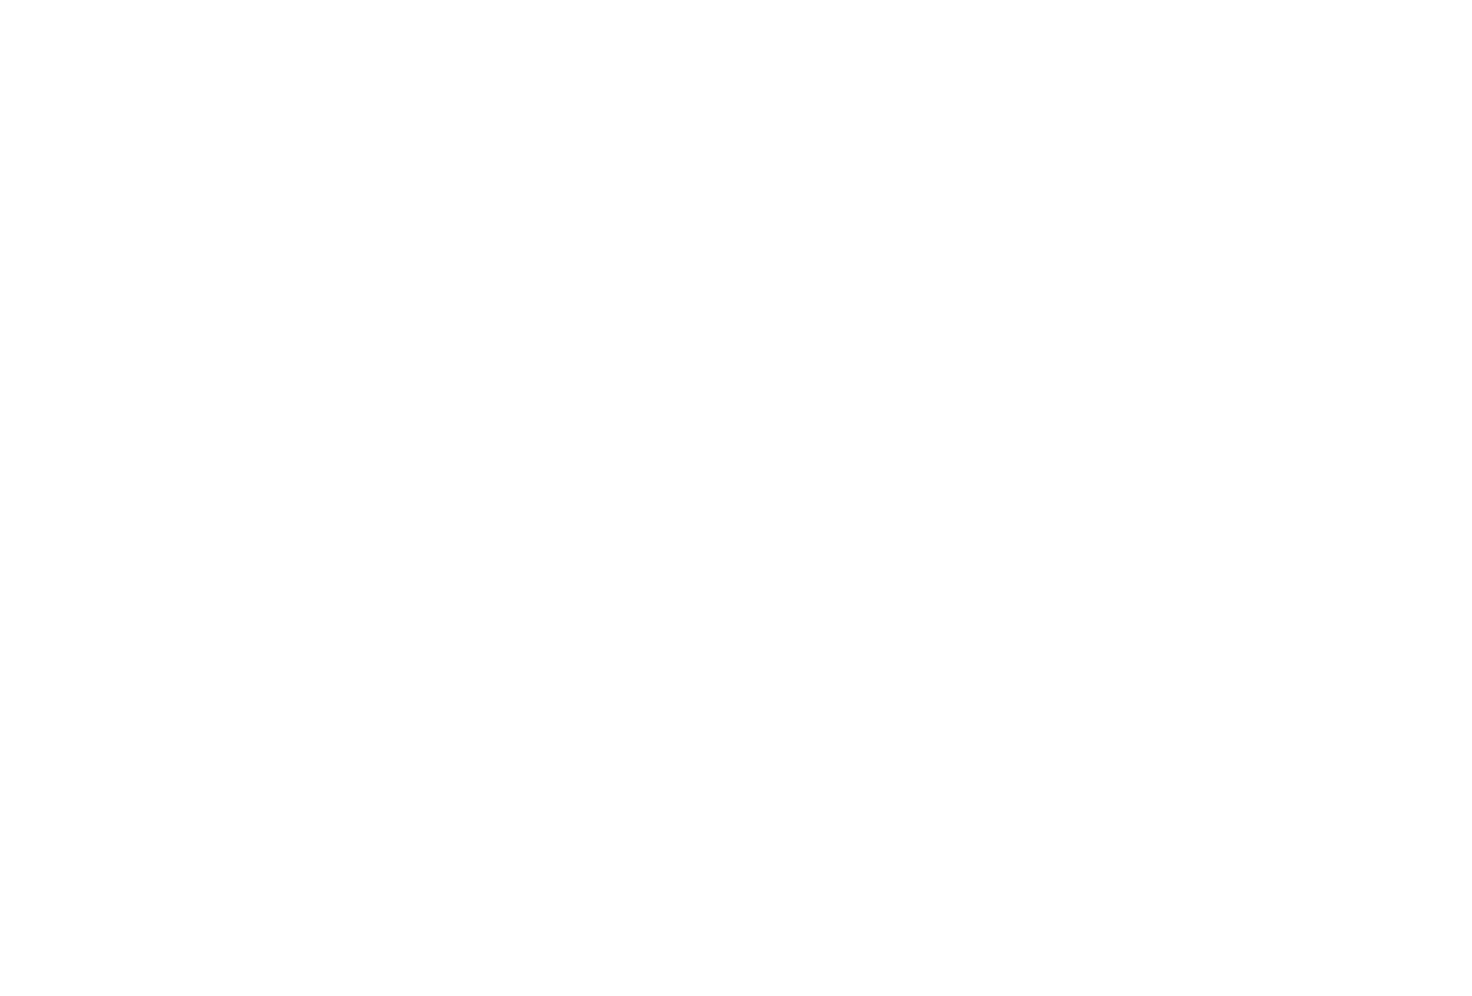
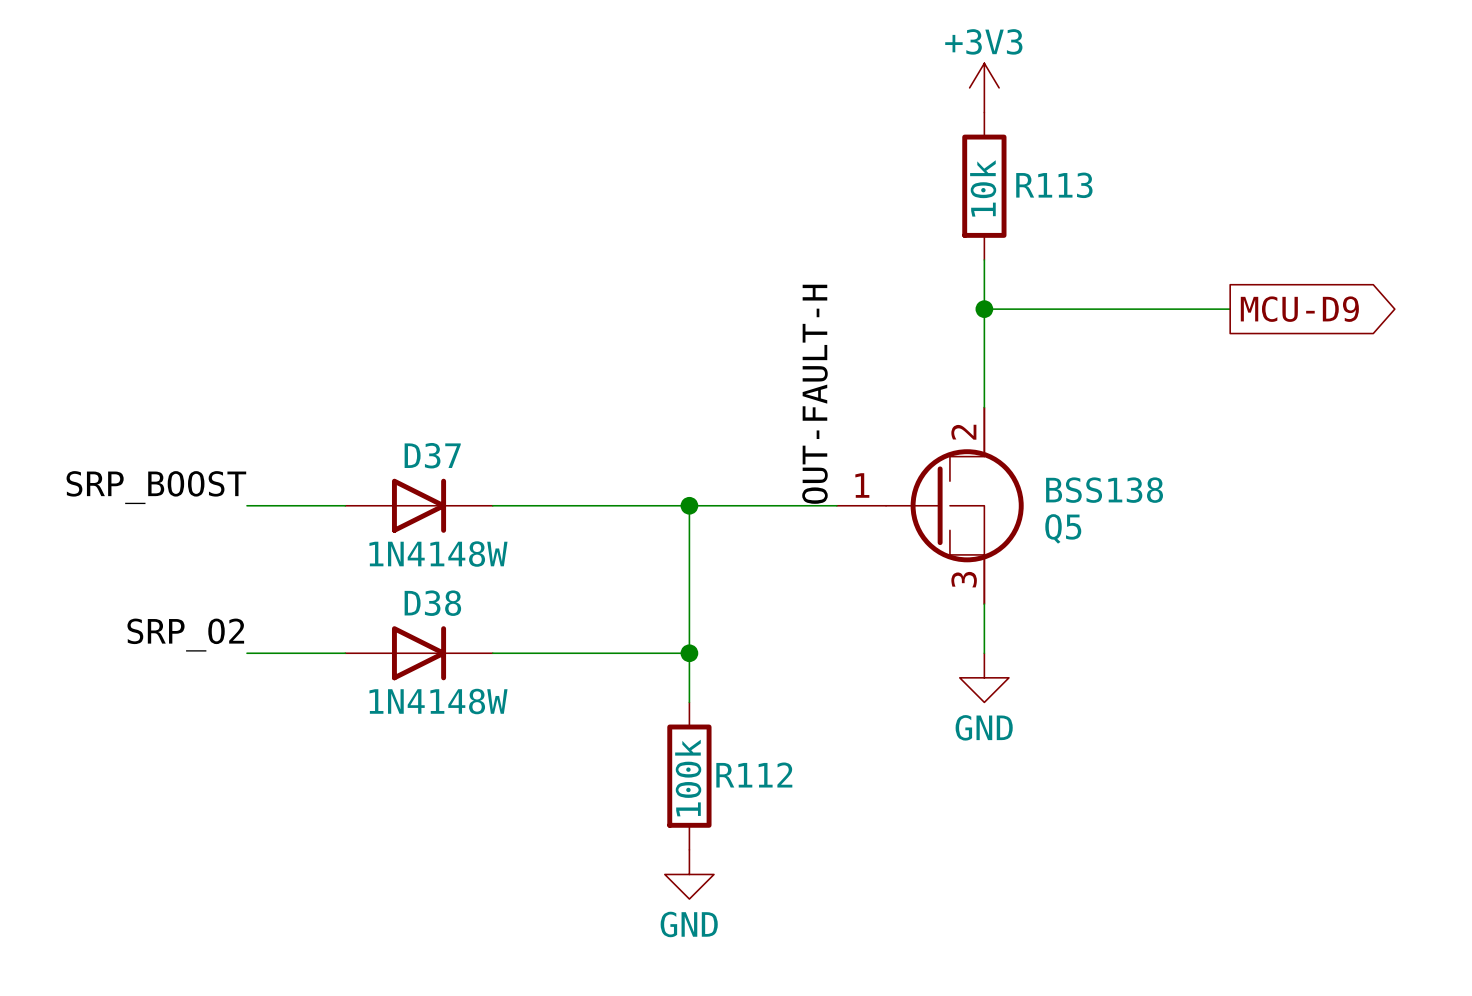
power symbol: none -> +3V3 (984, 87)
R113: none -> 10k (984, 186)
wire: none -> (984, 259) (984, 407)
wire: none -> (984, 309) (1230, 309)
junction: none -> (984, 309)
global label: none -> MCU-D9 (1299, 309)
label: none -> OUT-FAULT-H (814, 394)
label: none -> SRP_BOOST (156, 487)
wire: none -> (246, 505) (345, 505)
D37: none -> 1N4148W (419, 505)
wire: none -> (492, 505) (836, 505)
wire: none -> (689, 505) (689, 702)
junction: none -> (689, 505)
Q5: none -> BSS138 (930, 505)
wire: none -> (984, 604) (984, 653)
label: none -> SRP_O2 (185, 635)
wire: none -> (246, 653) (345, 653)
D38: none -> 1N4148W (419, 653)
wire: none -> (492, 653) (689, 653)
junction: none -> (689, 653)
power symbol: none -> GND (984, 677)
R112: none -> 100k (689, 776)
power symbol: none -> GND (689, 874)

